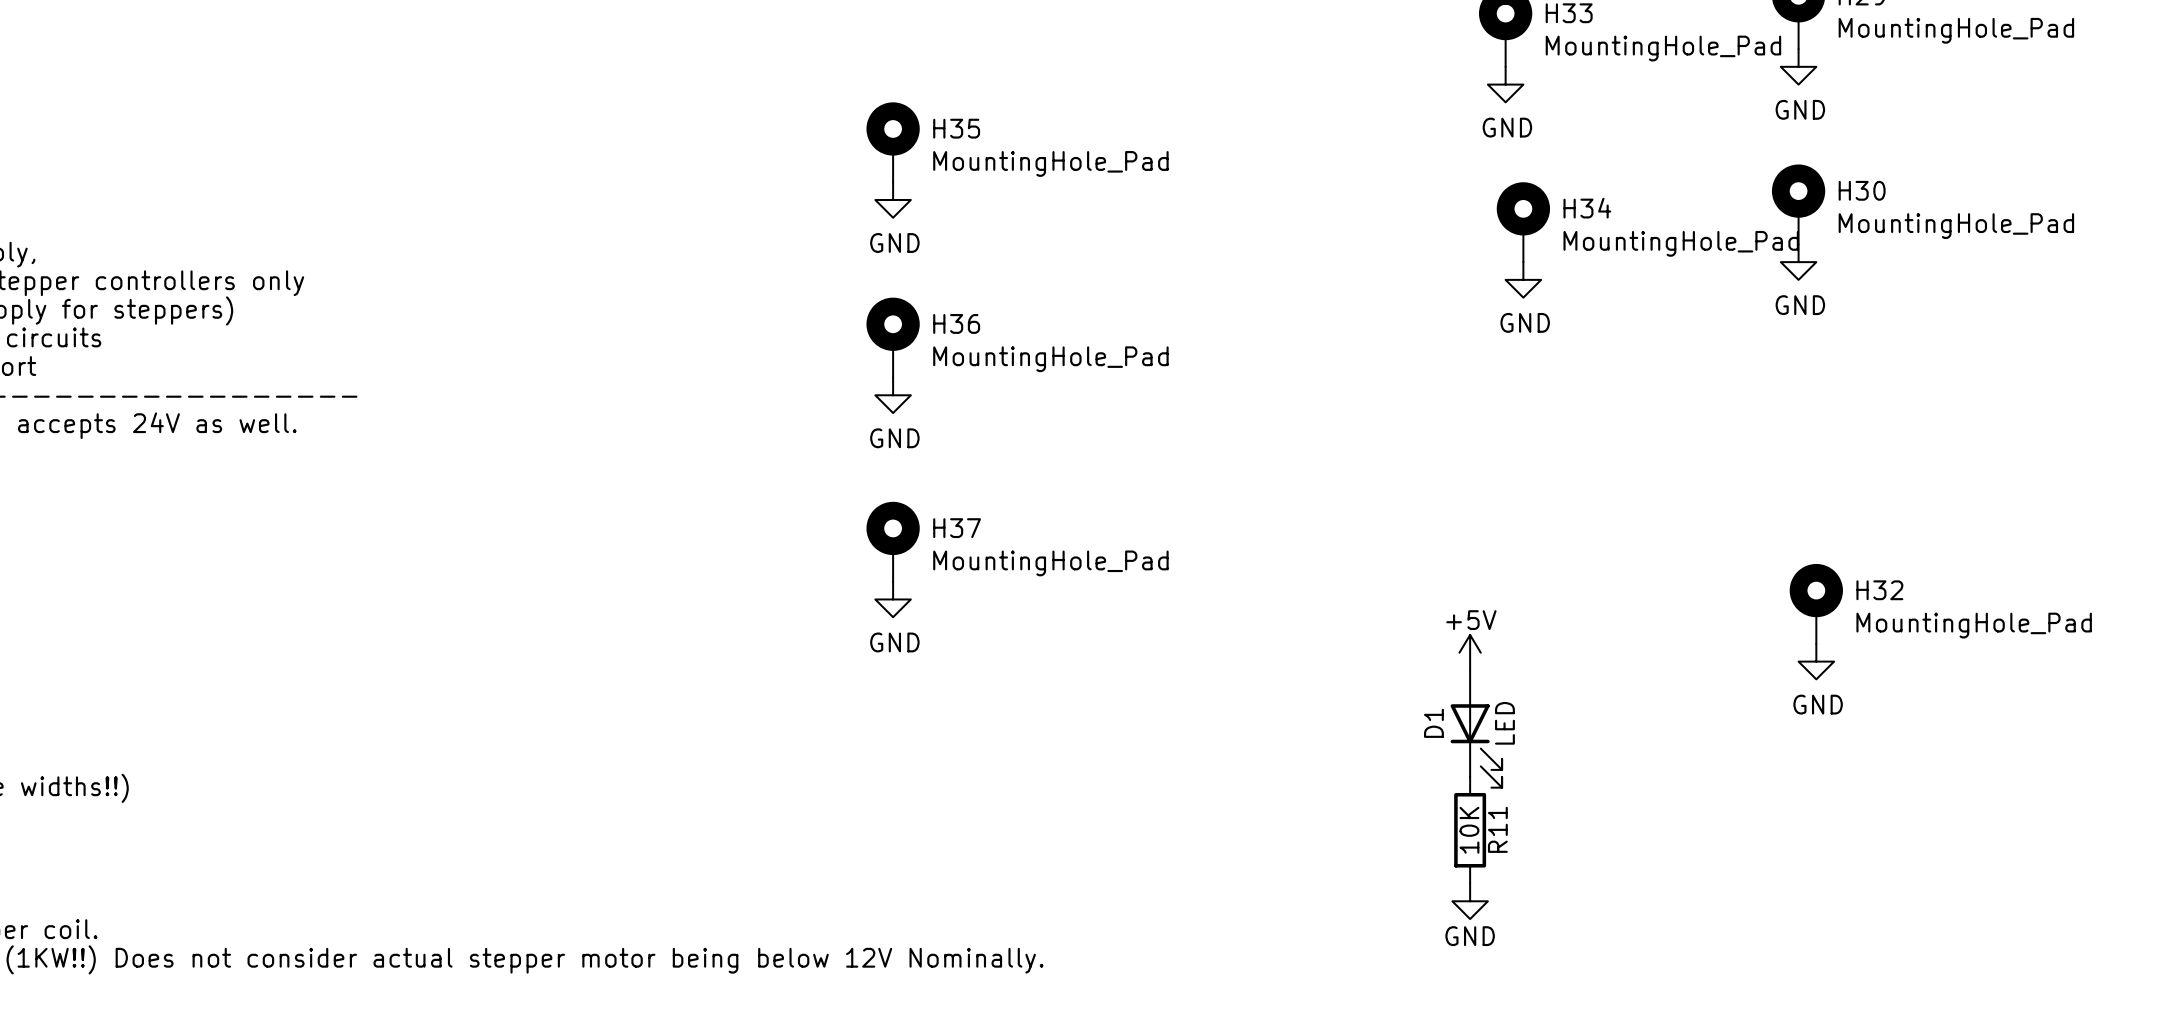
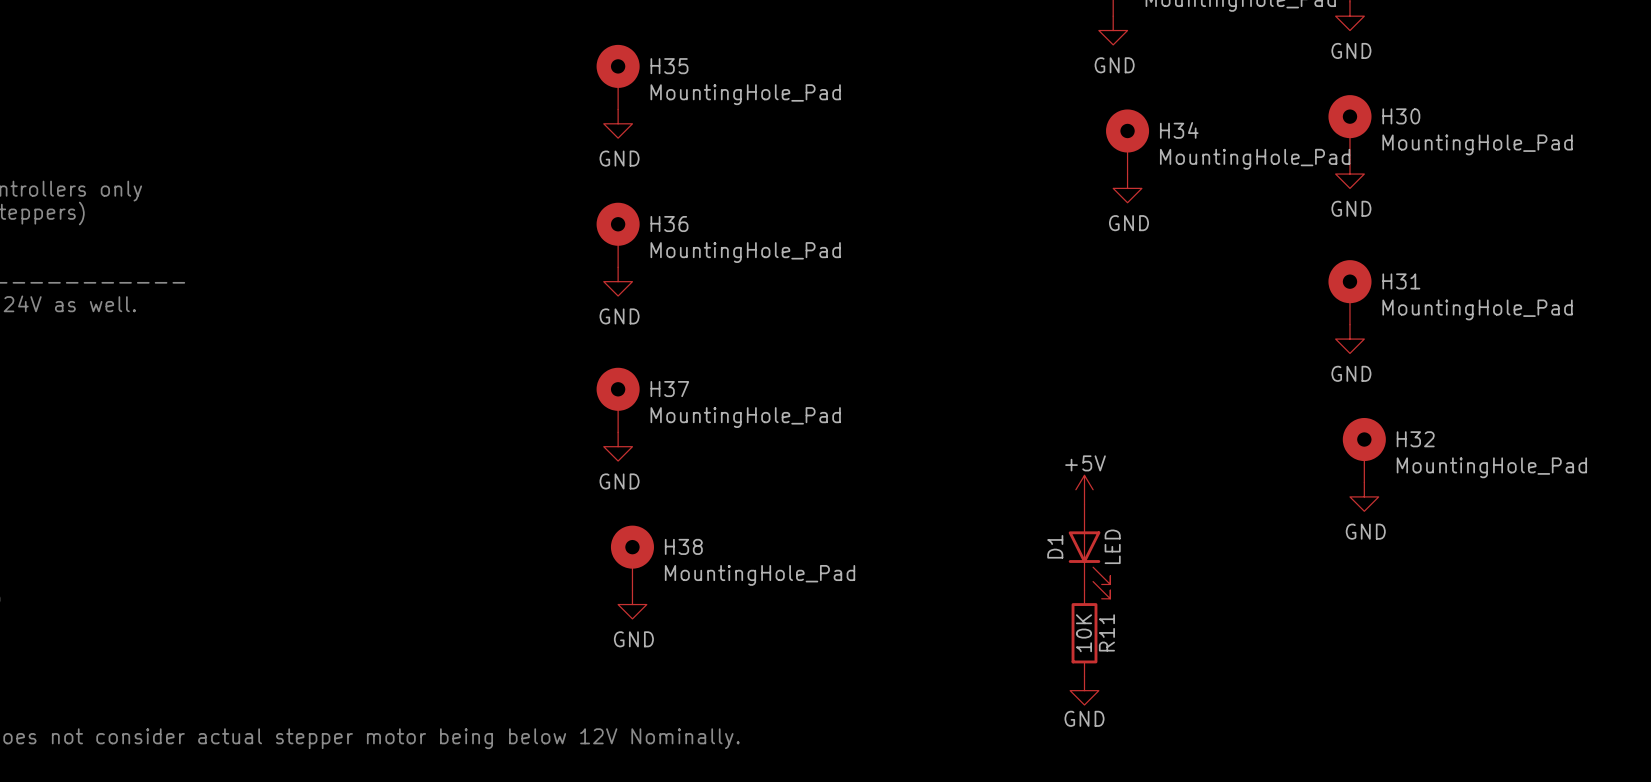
H31: none -> MountingHole_Pad (1349, 292)
power symbol: none -> GND (1349, 339)
H38: none -> MountingHole_Pad (632, 557)
power symbol: none -> GND (632, 604)

